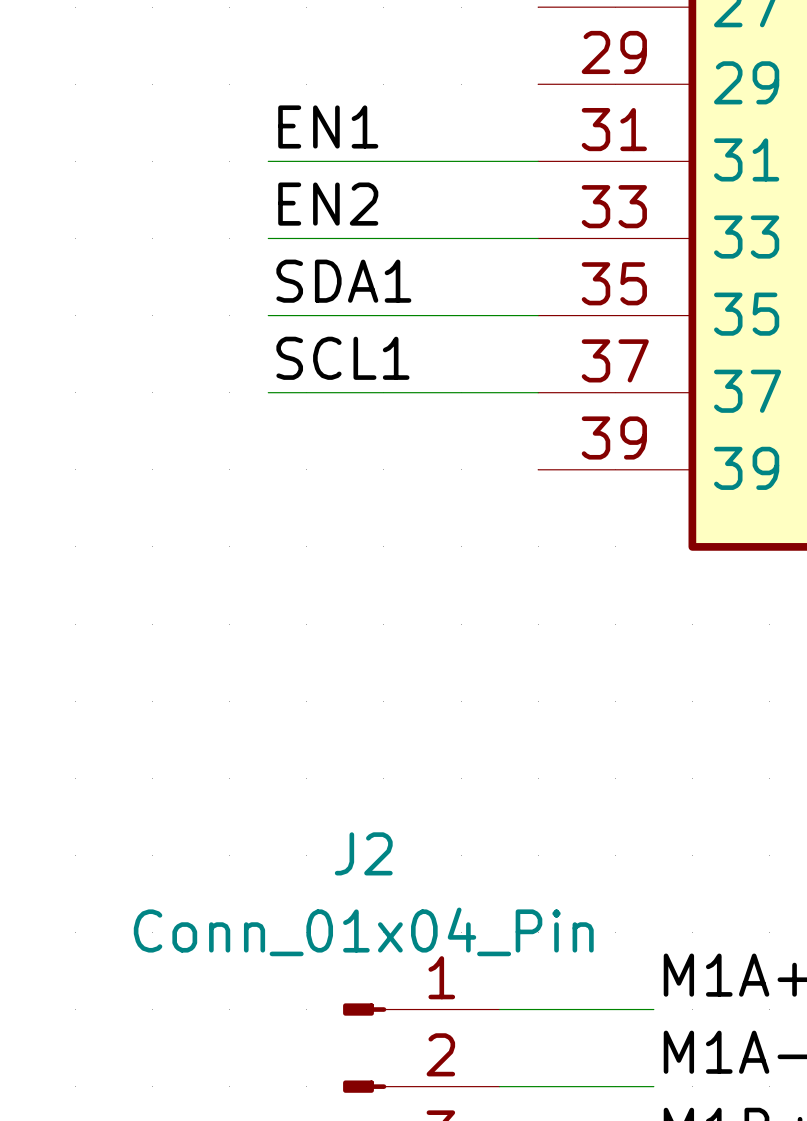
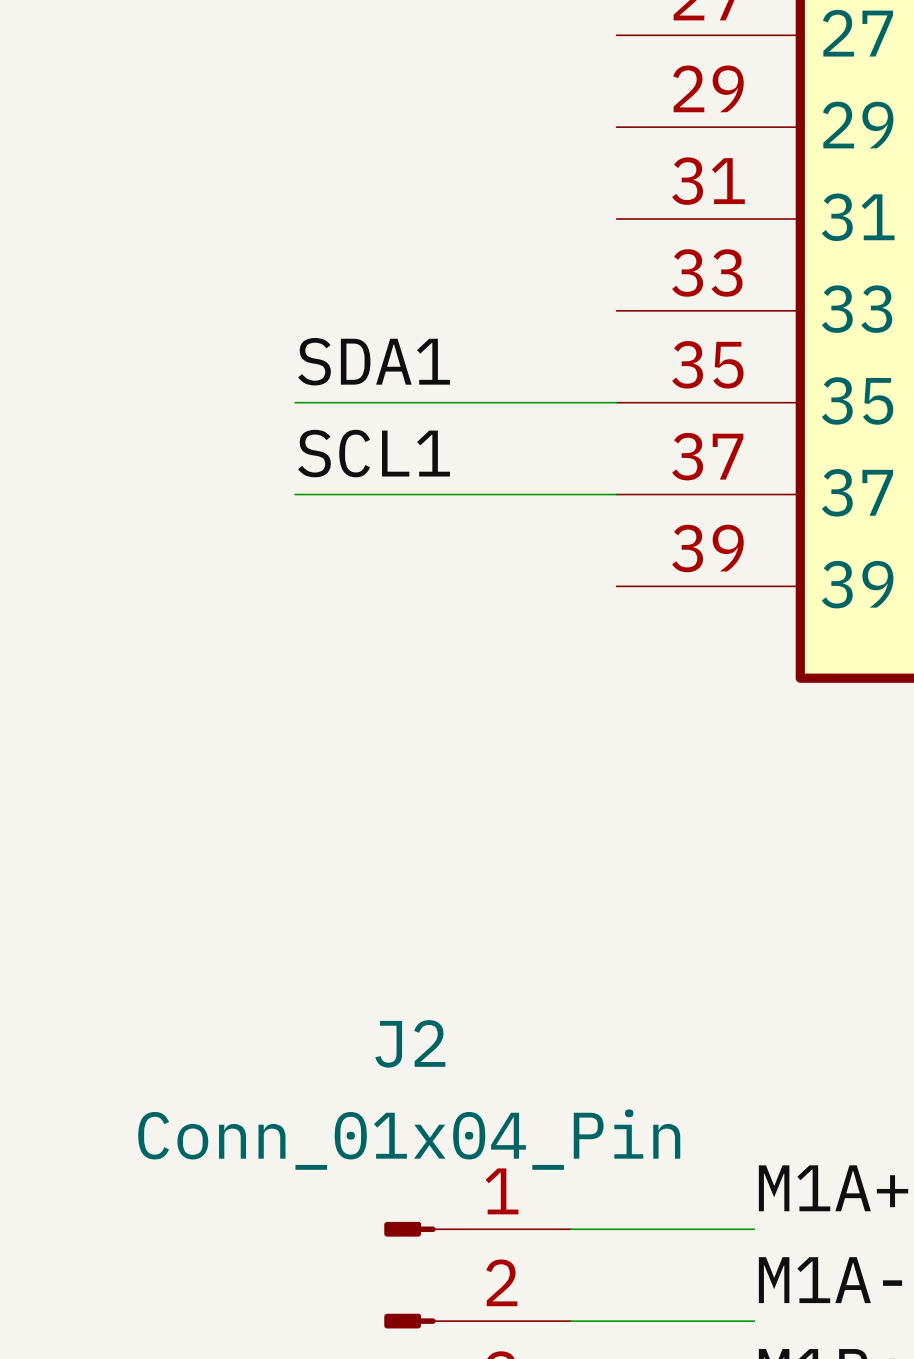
label: EN1 (328, 126) -> none
wire: (268, 161) (538, 161) -> none
label: EN2 (328, 204) -> none
wire: (268, 238) (538, 238) -> none

